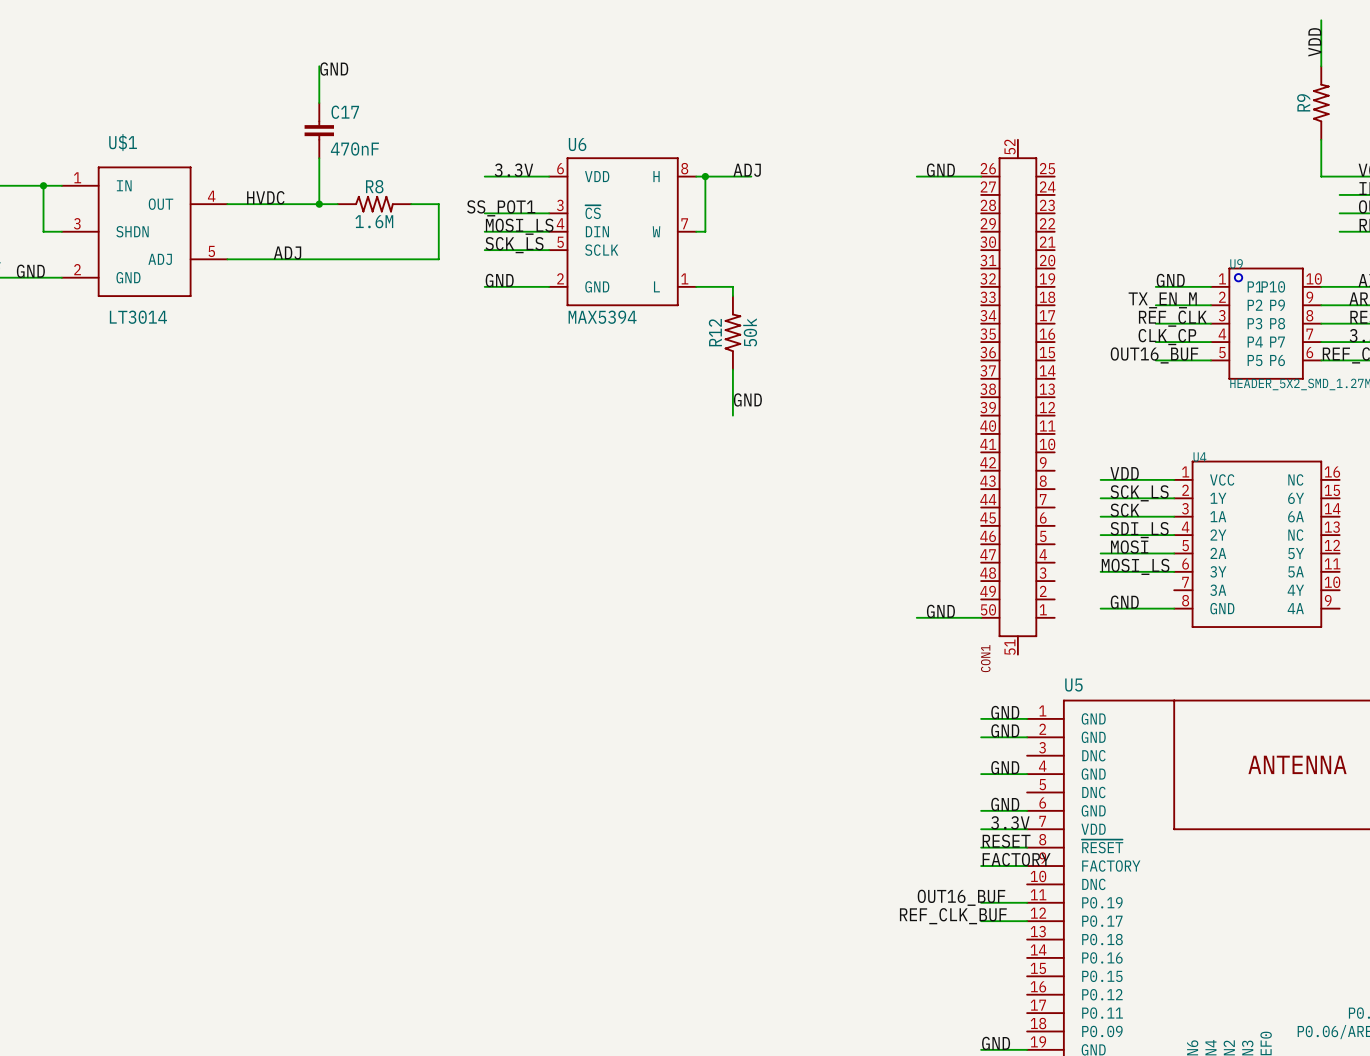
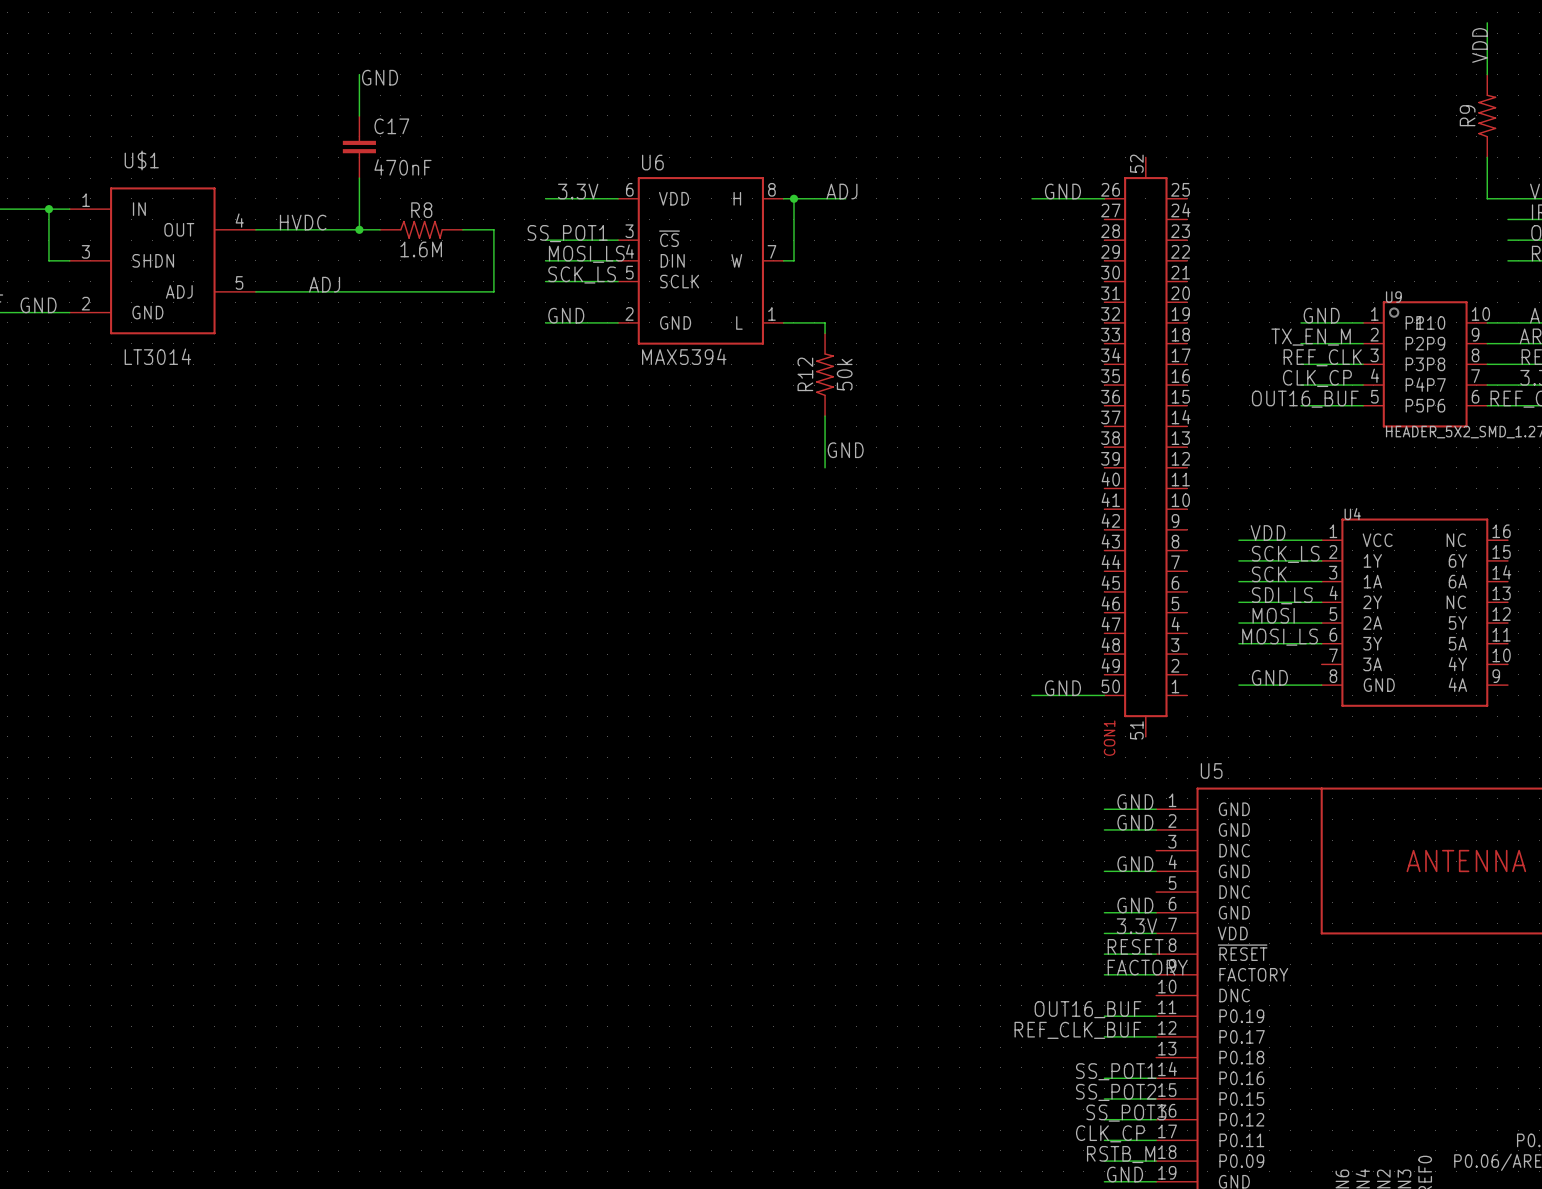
label: none -> SS_POT1 (1116, 1071)
wire: none -> (1104, 1078) (1156, 1078)
label: none -> SS_POT2 (1116, 1092)
wire: none -> (1104, 1098) (1156, 1098)
label: none -> SS_POT3 (1126, 1113)
wire: none -> (1104, 1119) (1156, 1119)
label: none -> CLK_CP (1110, 1133)
wire: none -> (1104, 1140) (1156, 1140)
label: none -> RSTB_M (1121, 1154)
wire: none -> (1104, 1161) (1156, 1161)

